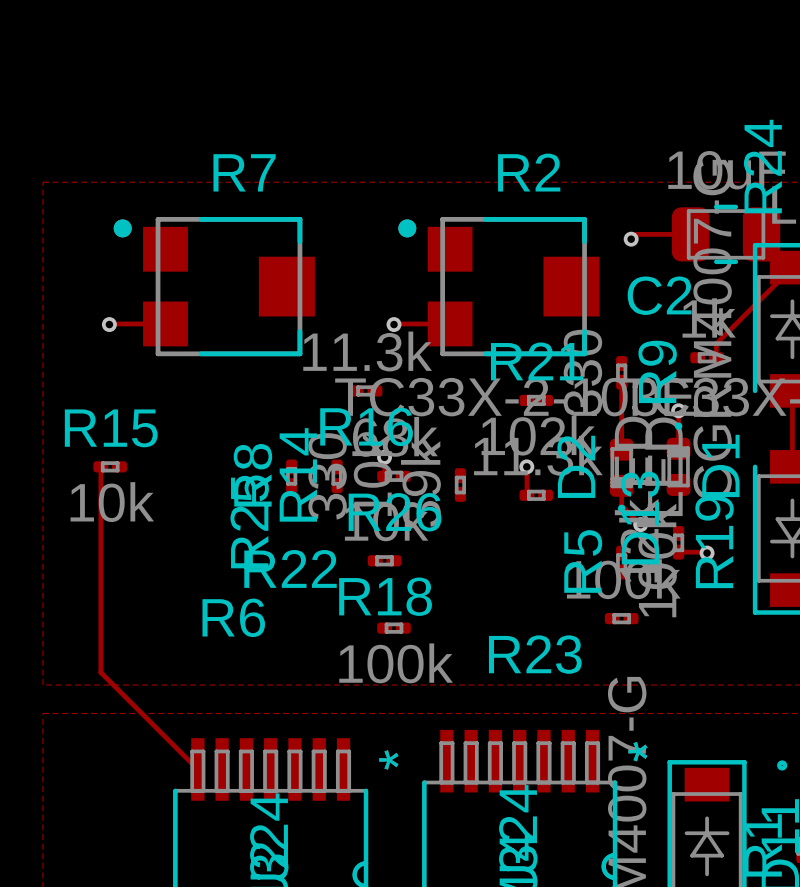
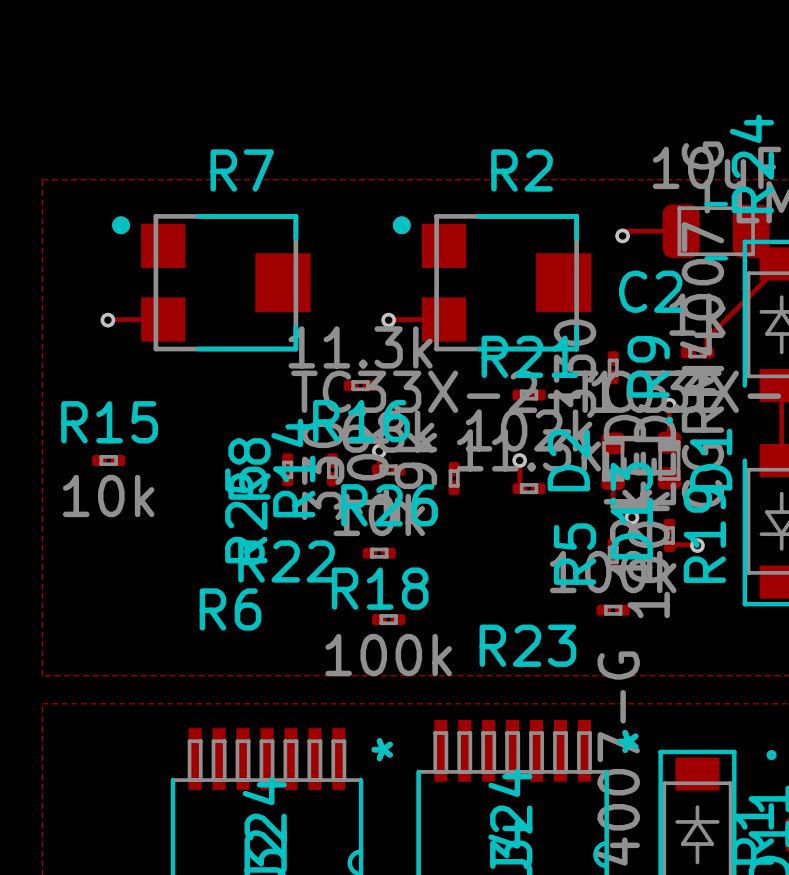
track: (621, 382) (621, 449) -> none
track: (100, 466) (100, 672) (197, 769) -> none

